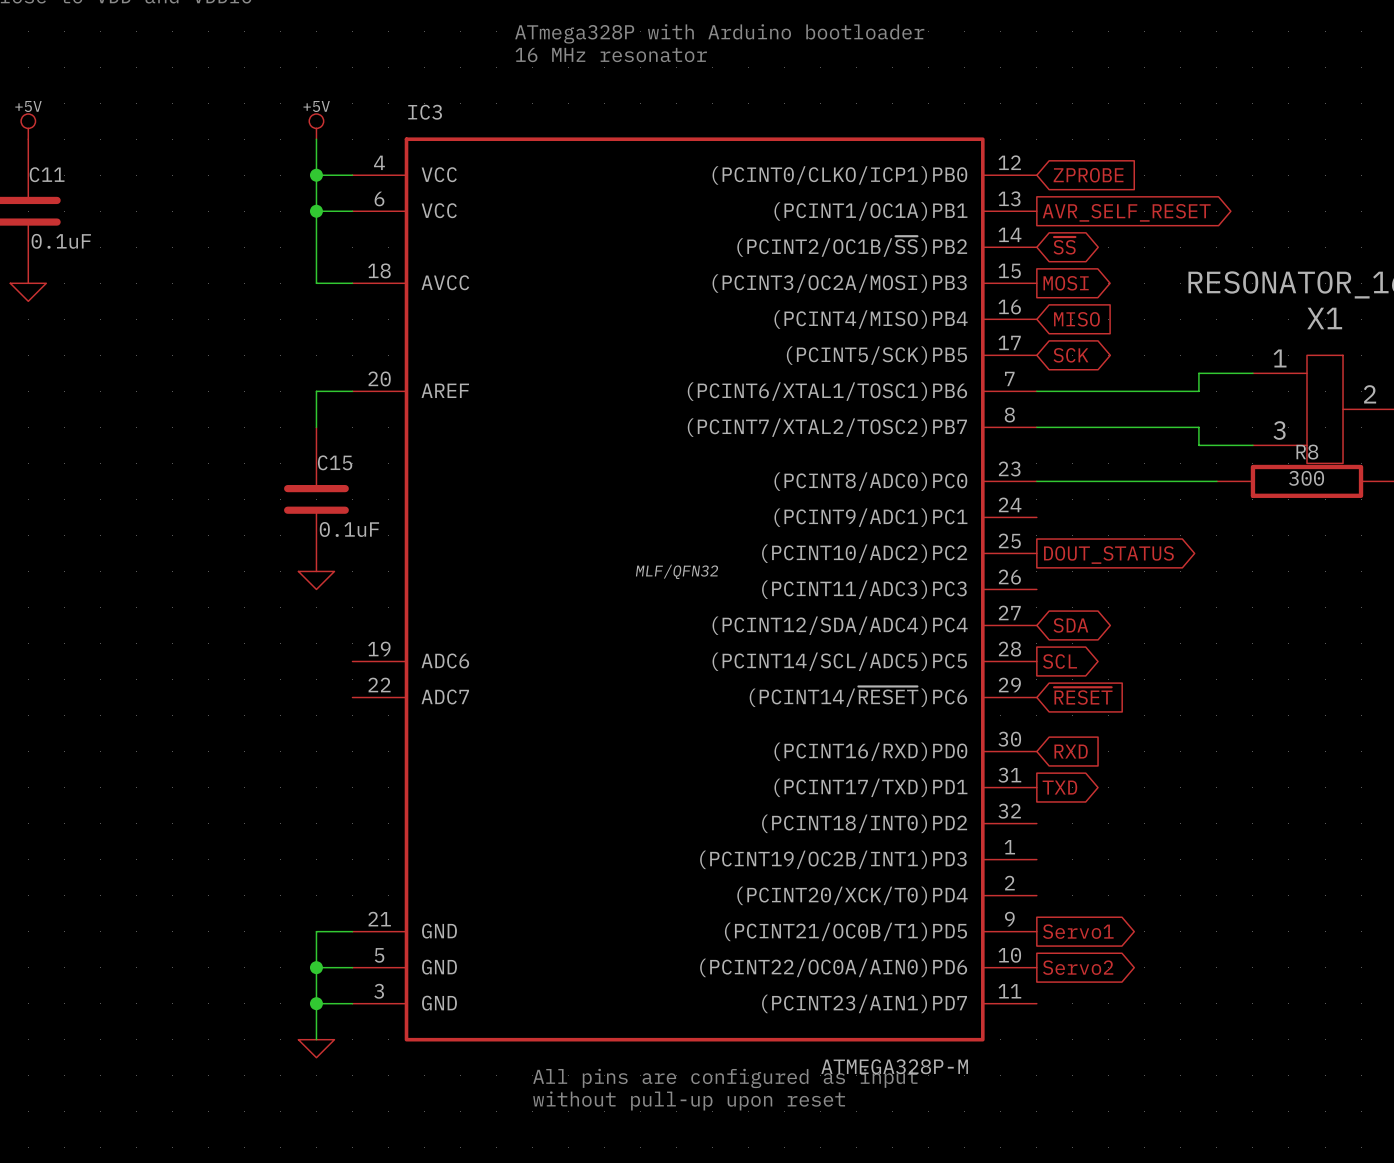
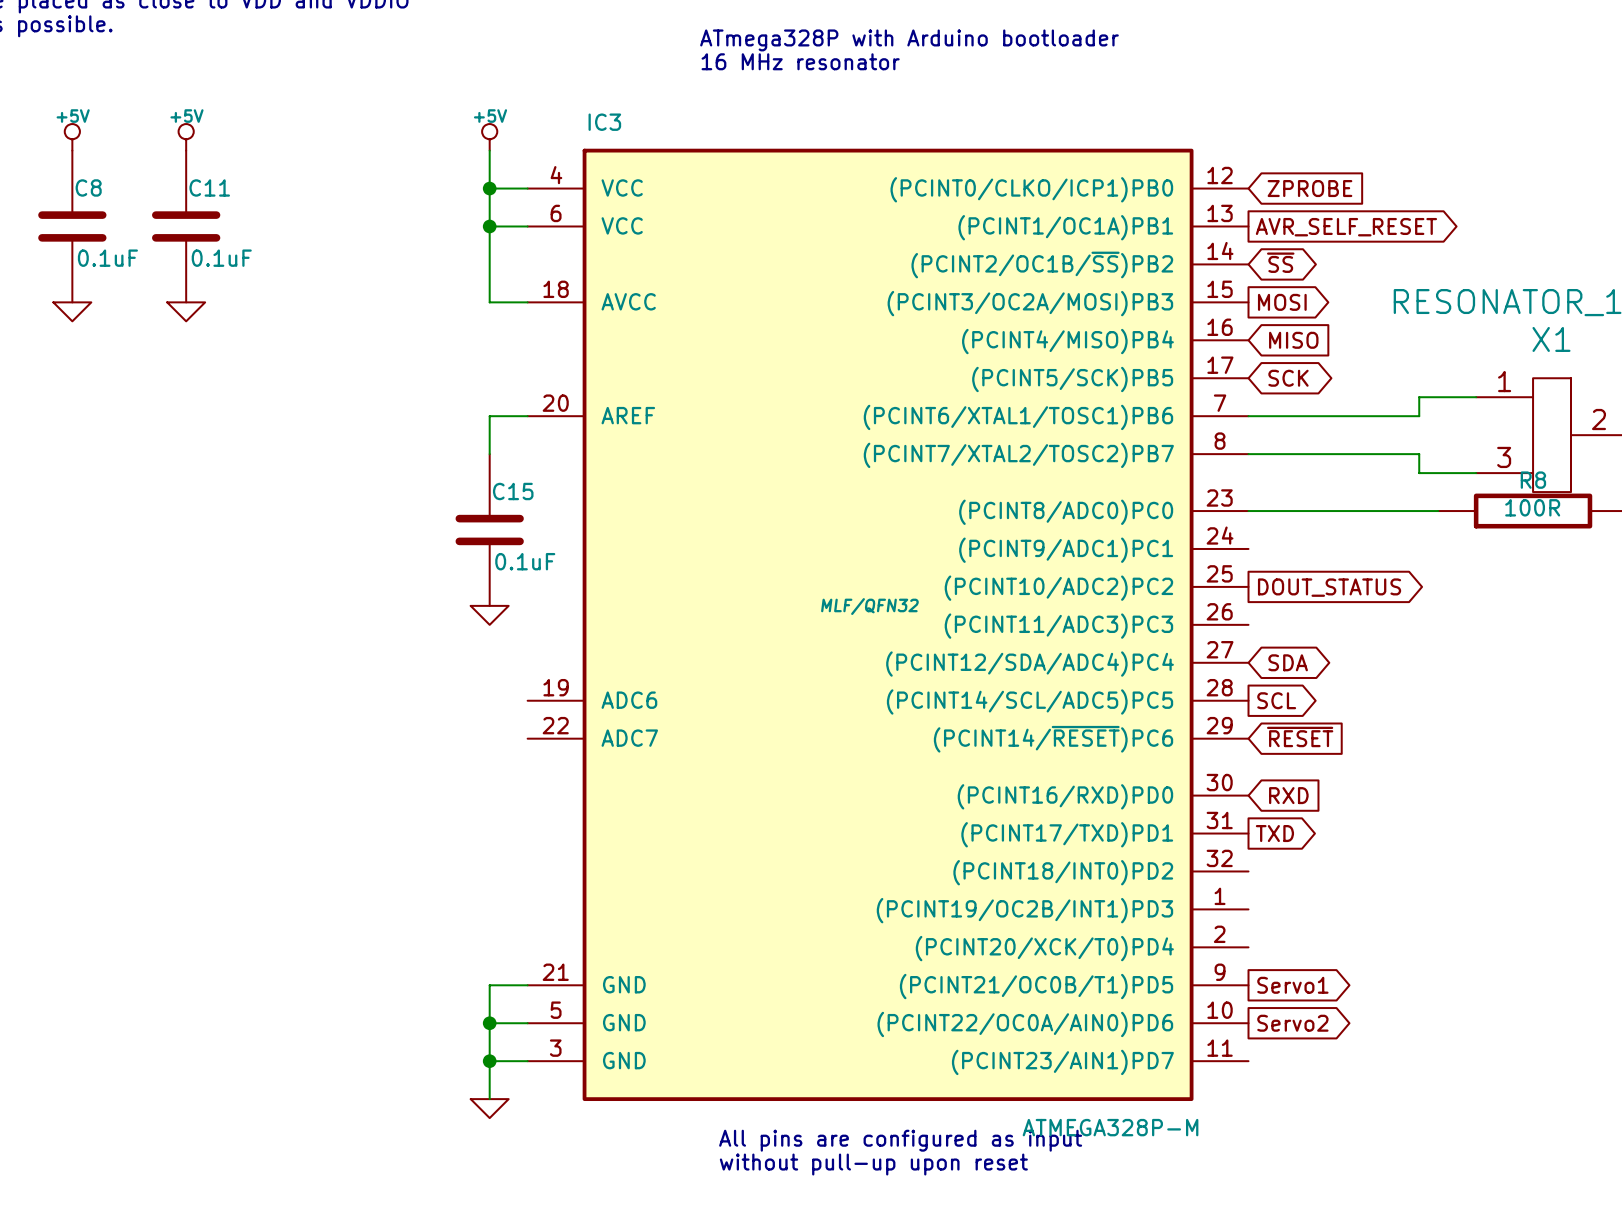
R8 value: 300 (1306, 478) -> 100R (1532, 507)

